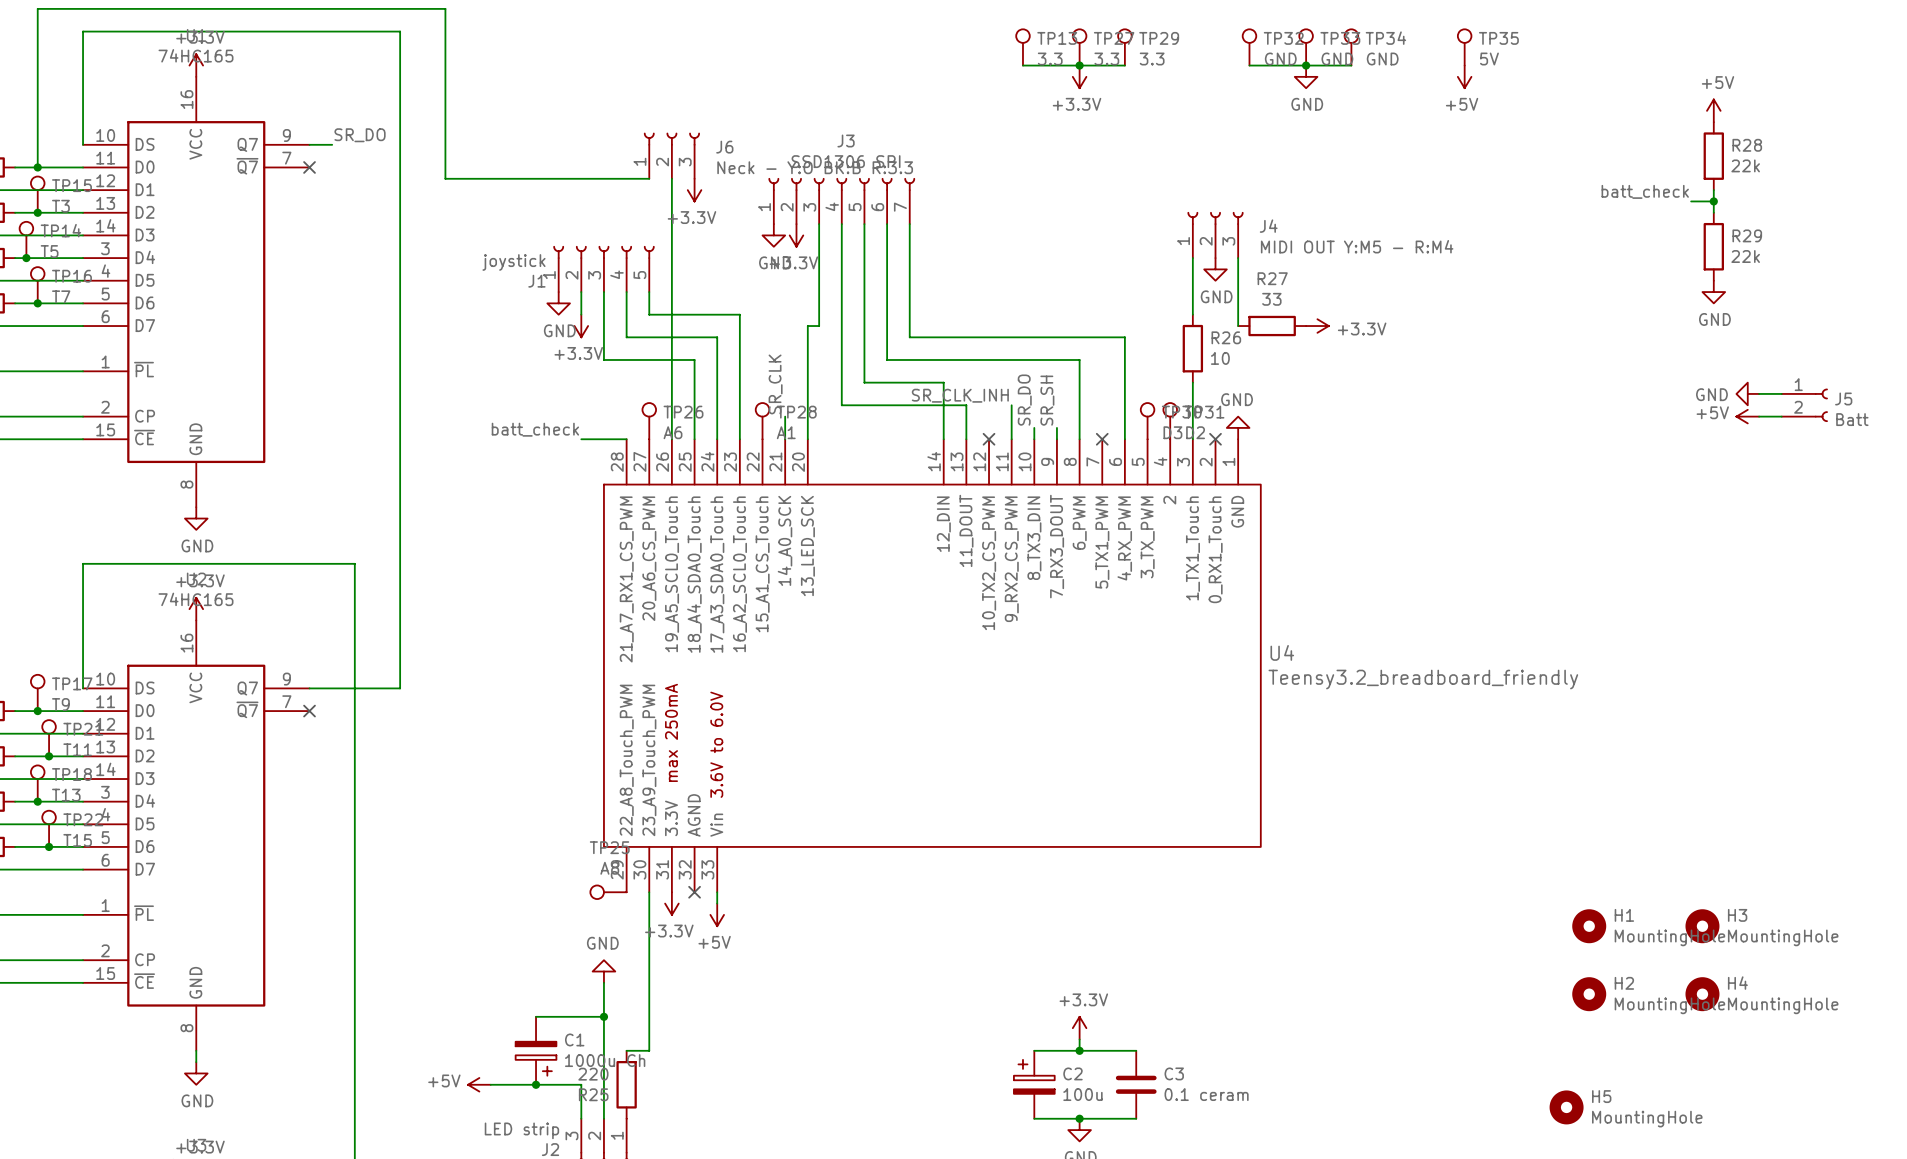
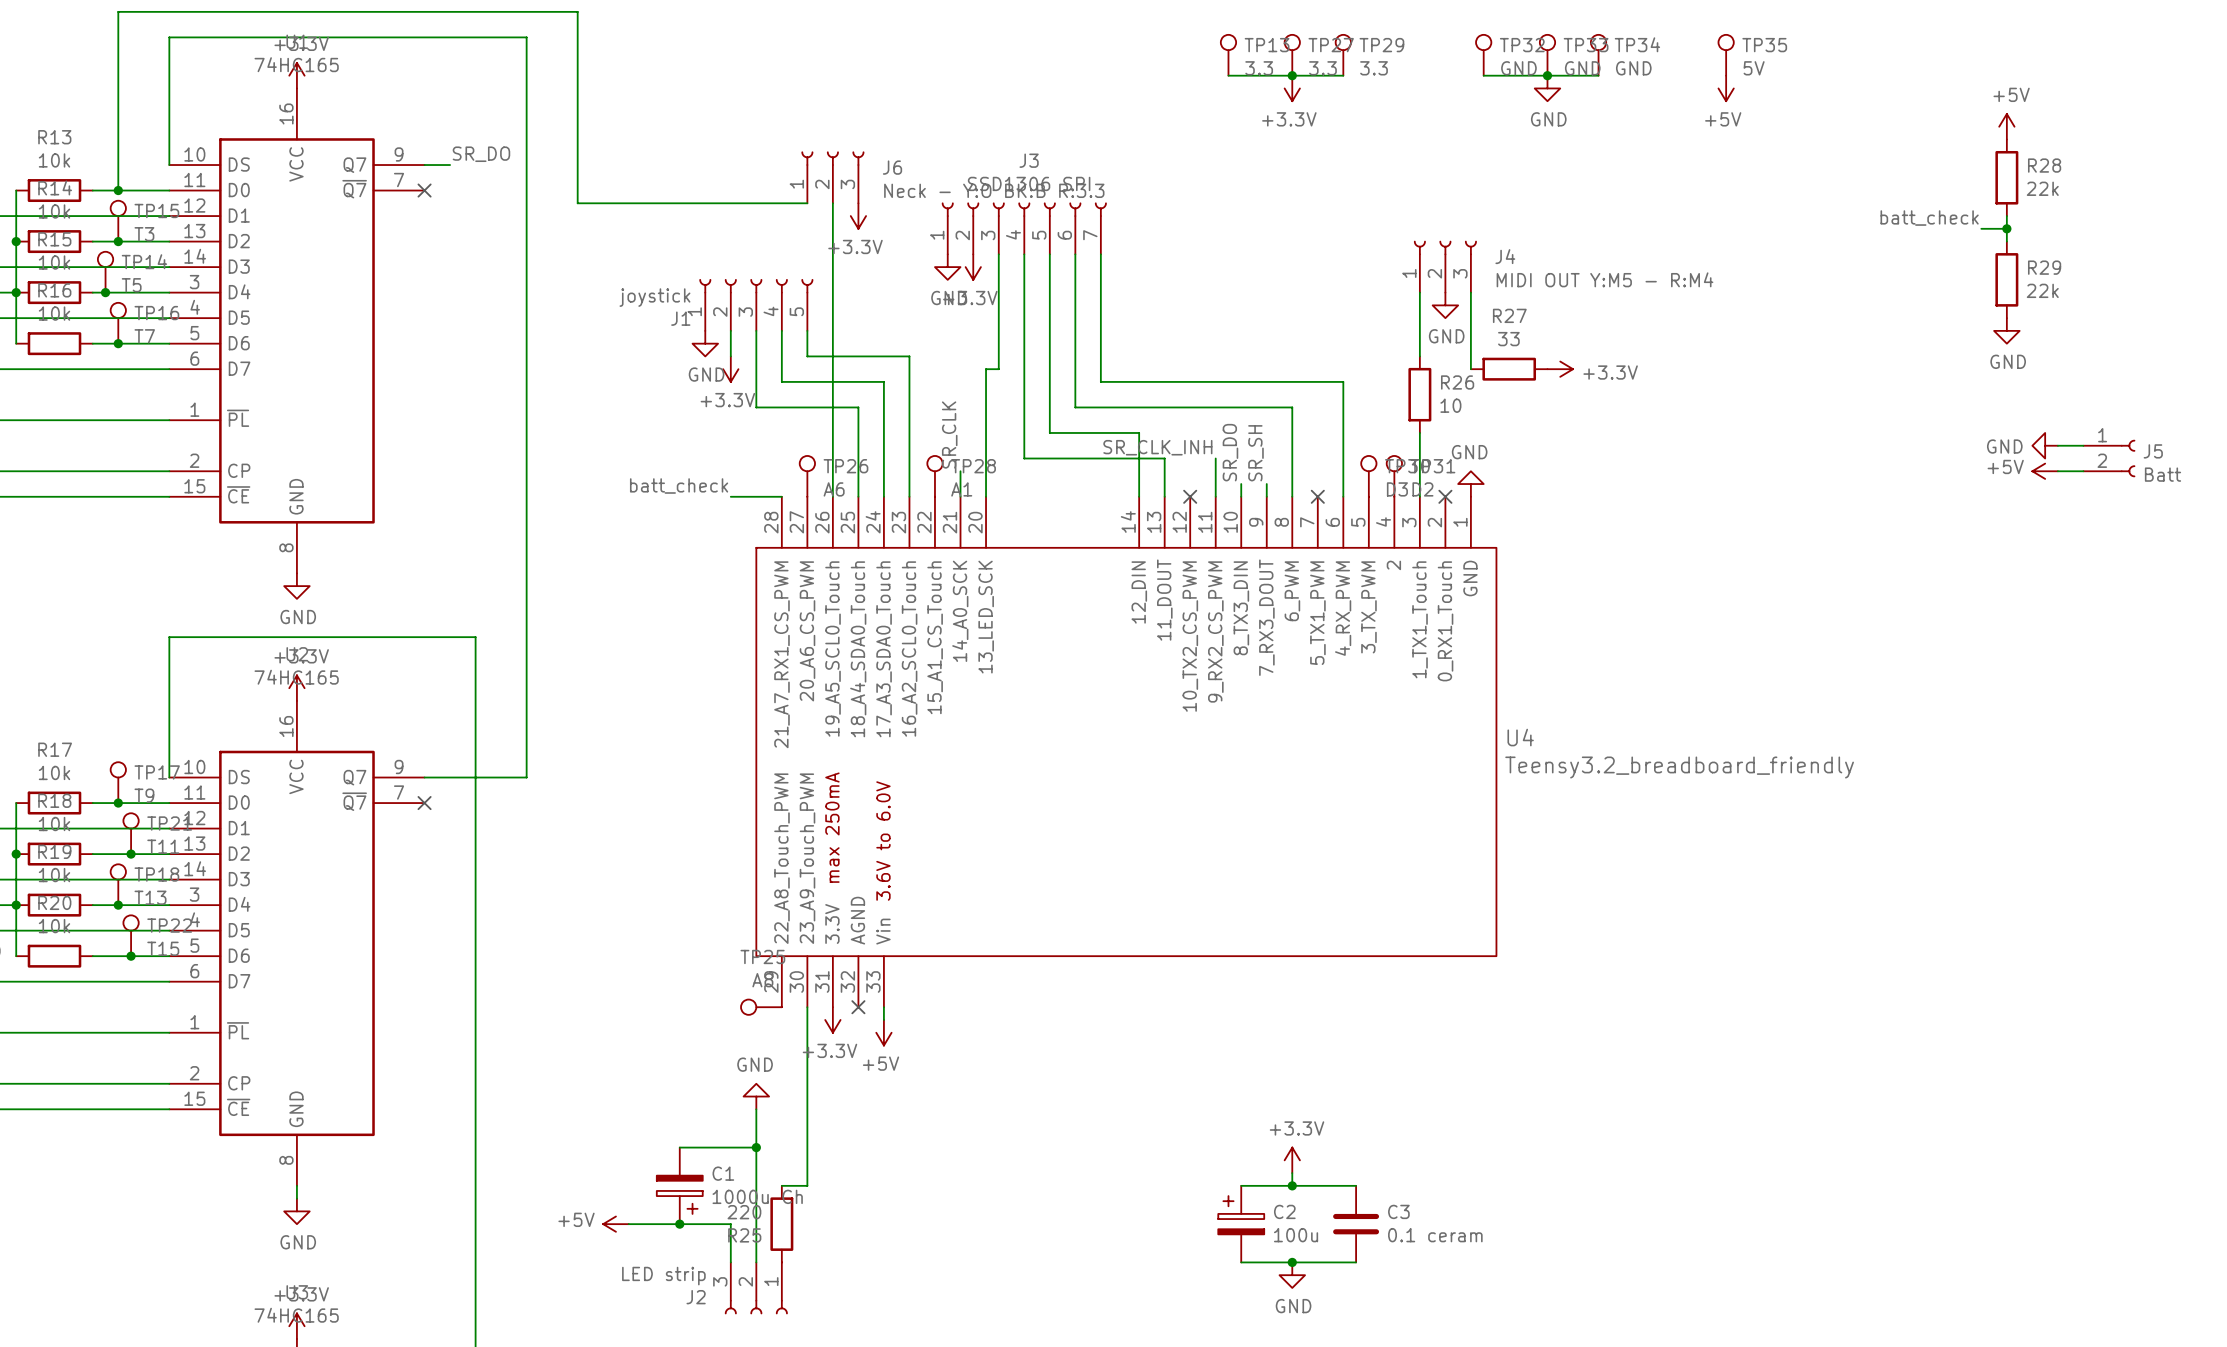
H1: MountingHole (1589, 926) -> none
H3: MountingHole (1702, 926) -> none
H2: MountingHole (1589, 994) -> none
H4: MountingHole (1702, 994) -> none
H5: MountingHole (1566, 1107) -> none

